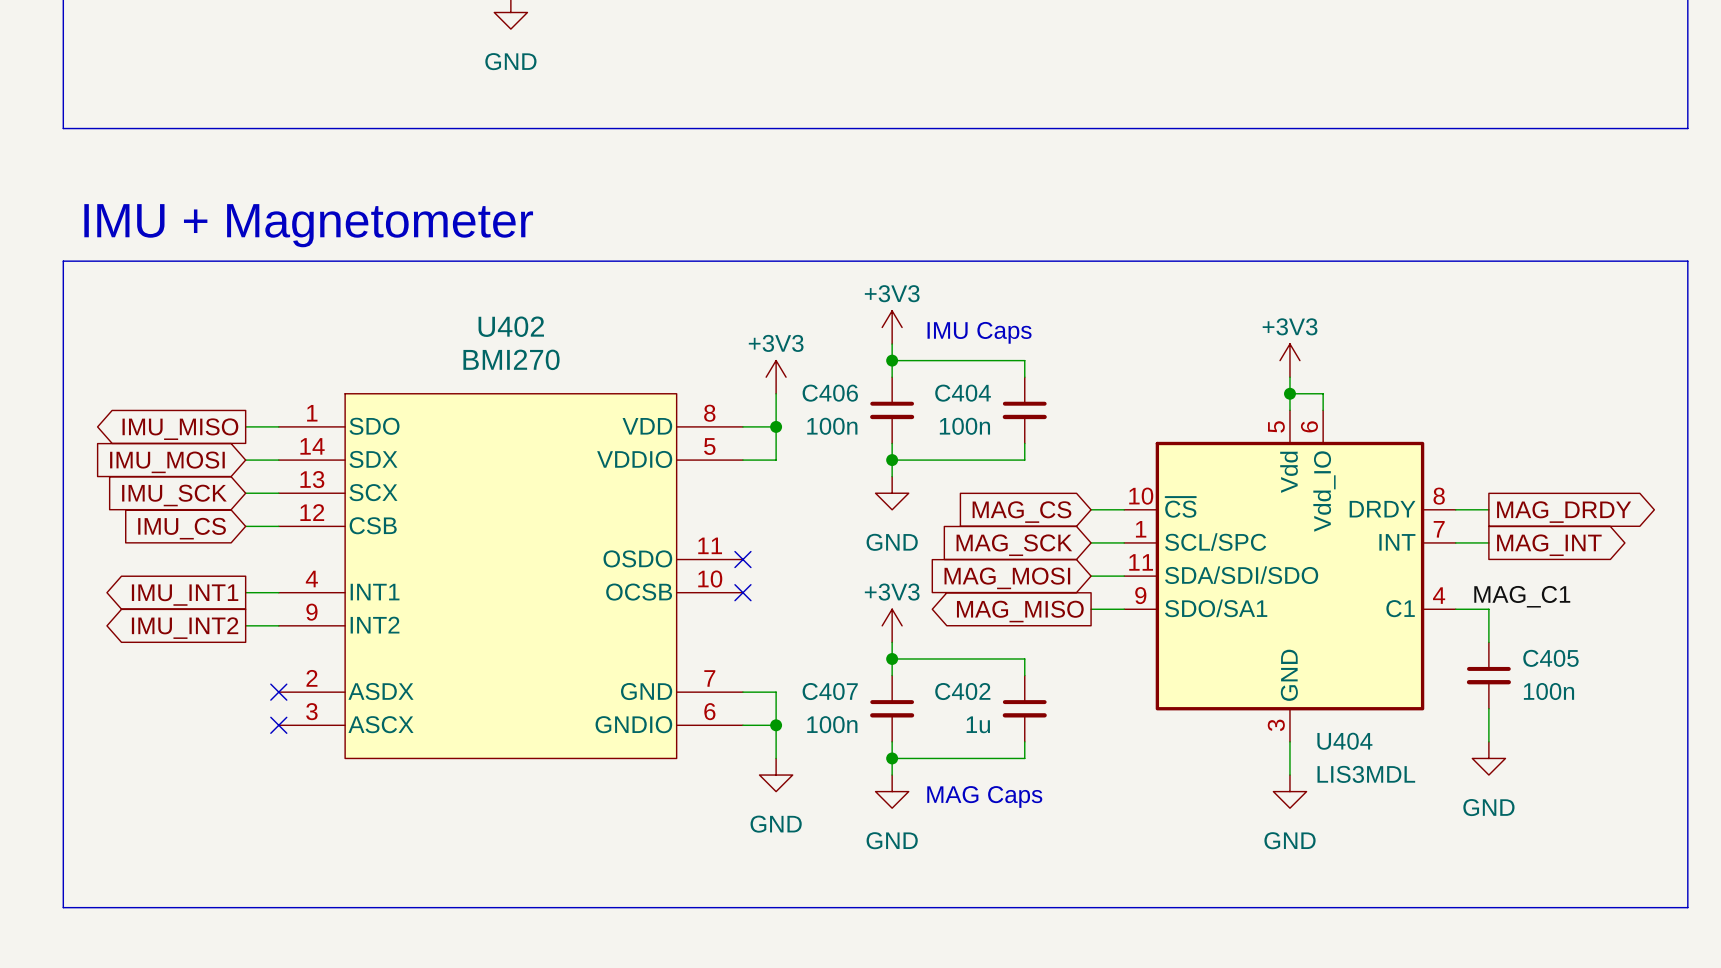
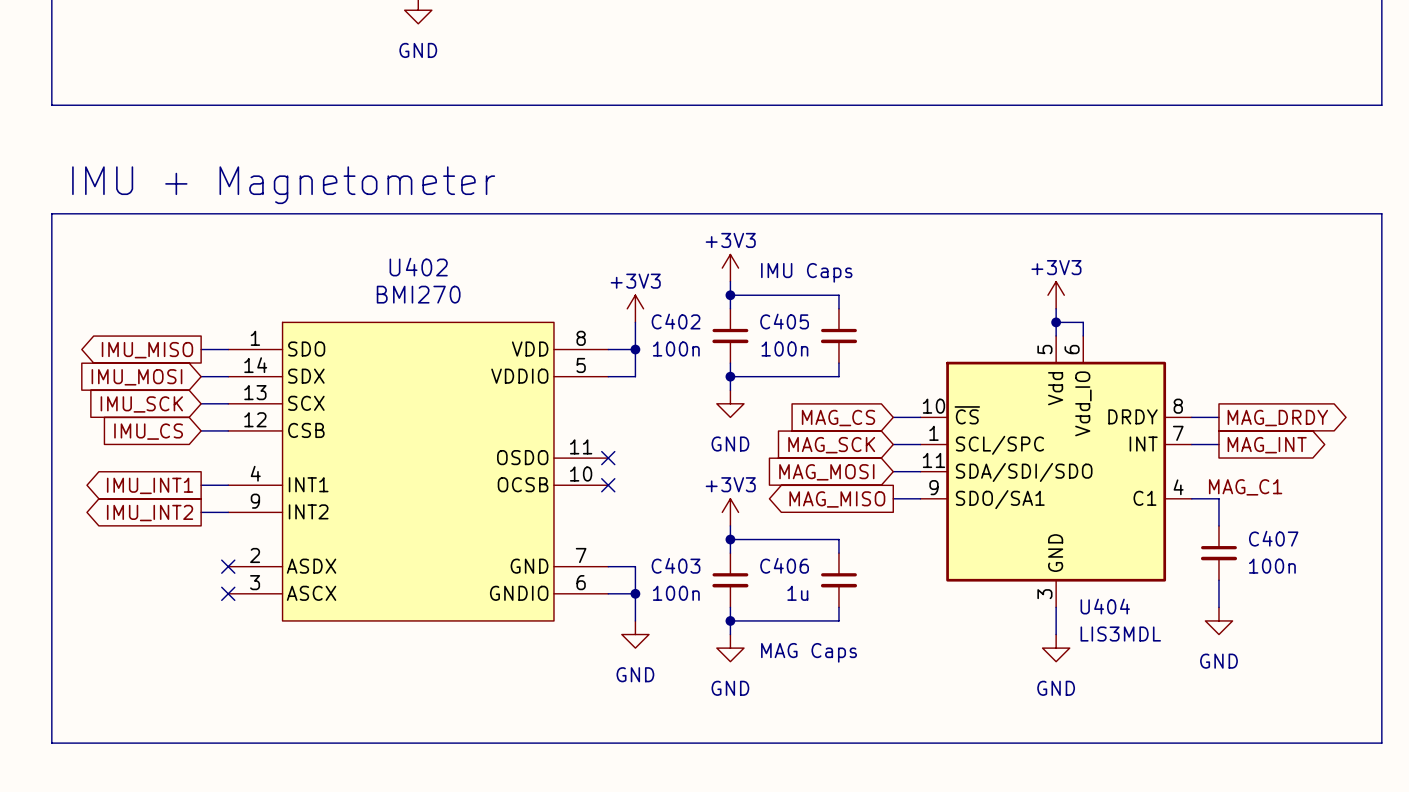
C406 name: C406 (830, 393) -> C402 (676, 321)
C404 name: C404 (963, 393) -> C405 (784, 321)
C405 name: C405 (1550, 658) -> C407 (1273, 538)
C407 name: C407 (830, 691) -> C403 (676, 565)
C402 name: C402 (962, 691) -> C406 (784, 565)

